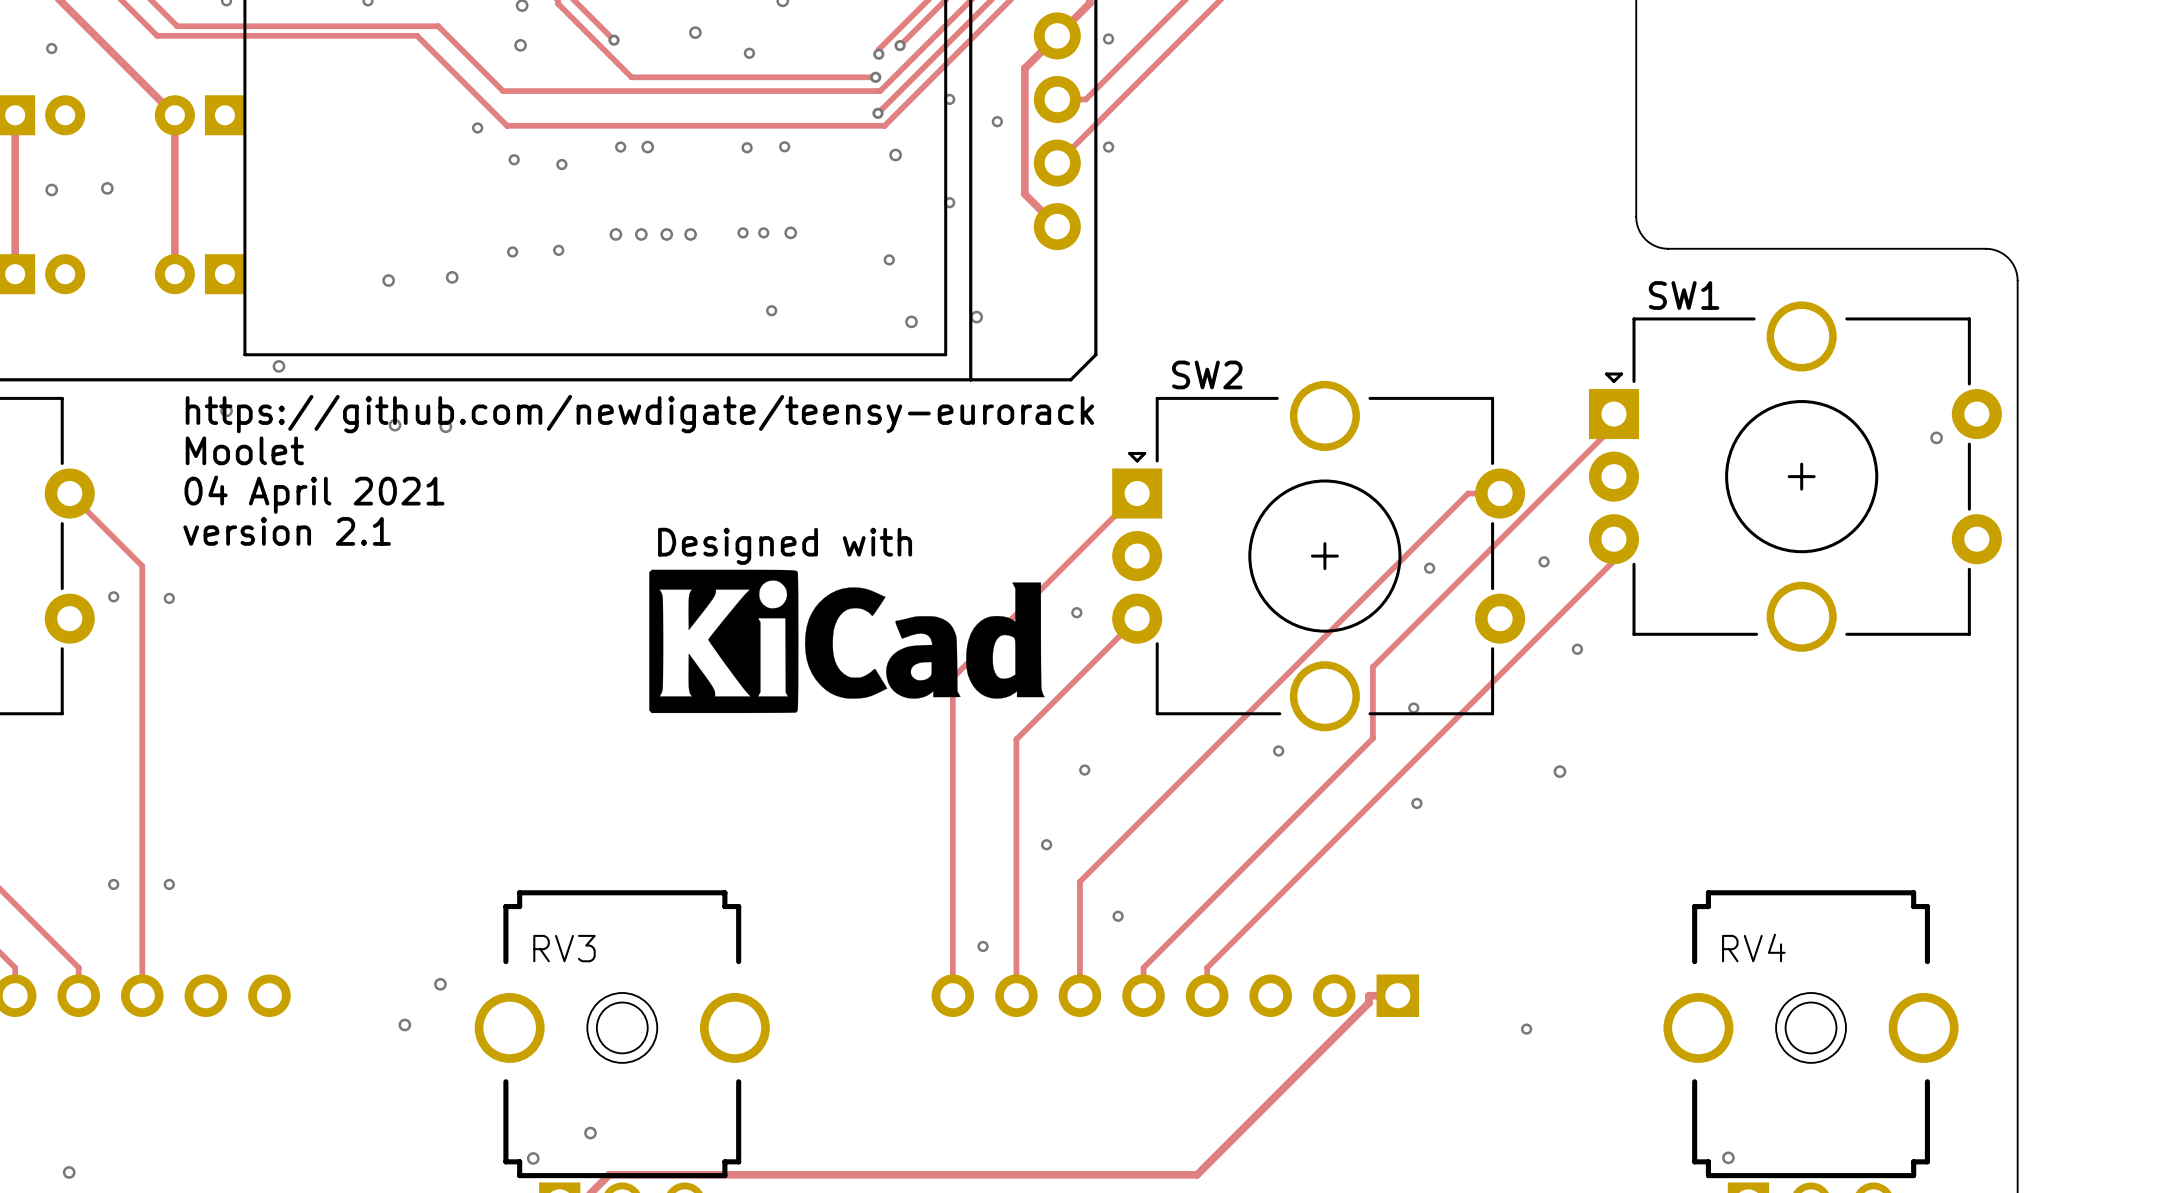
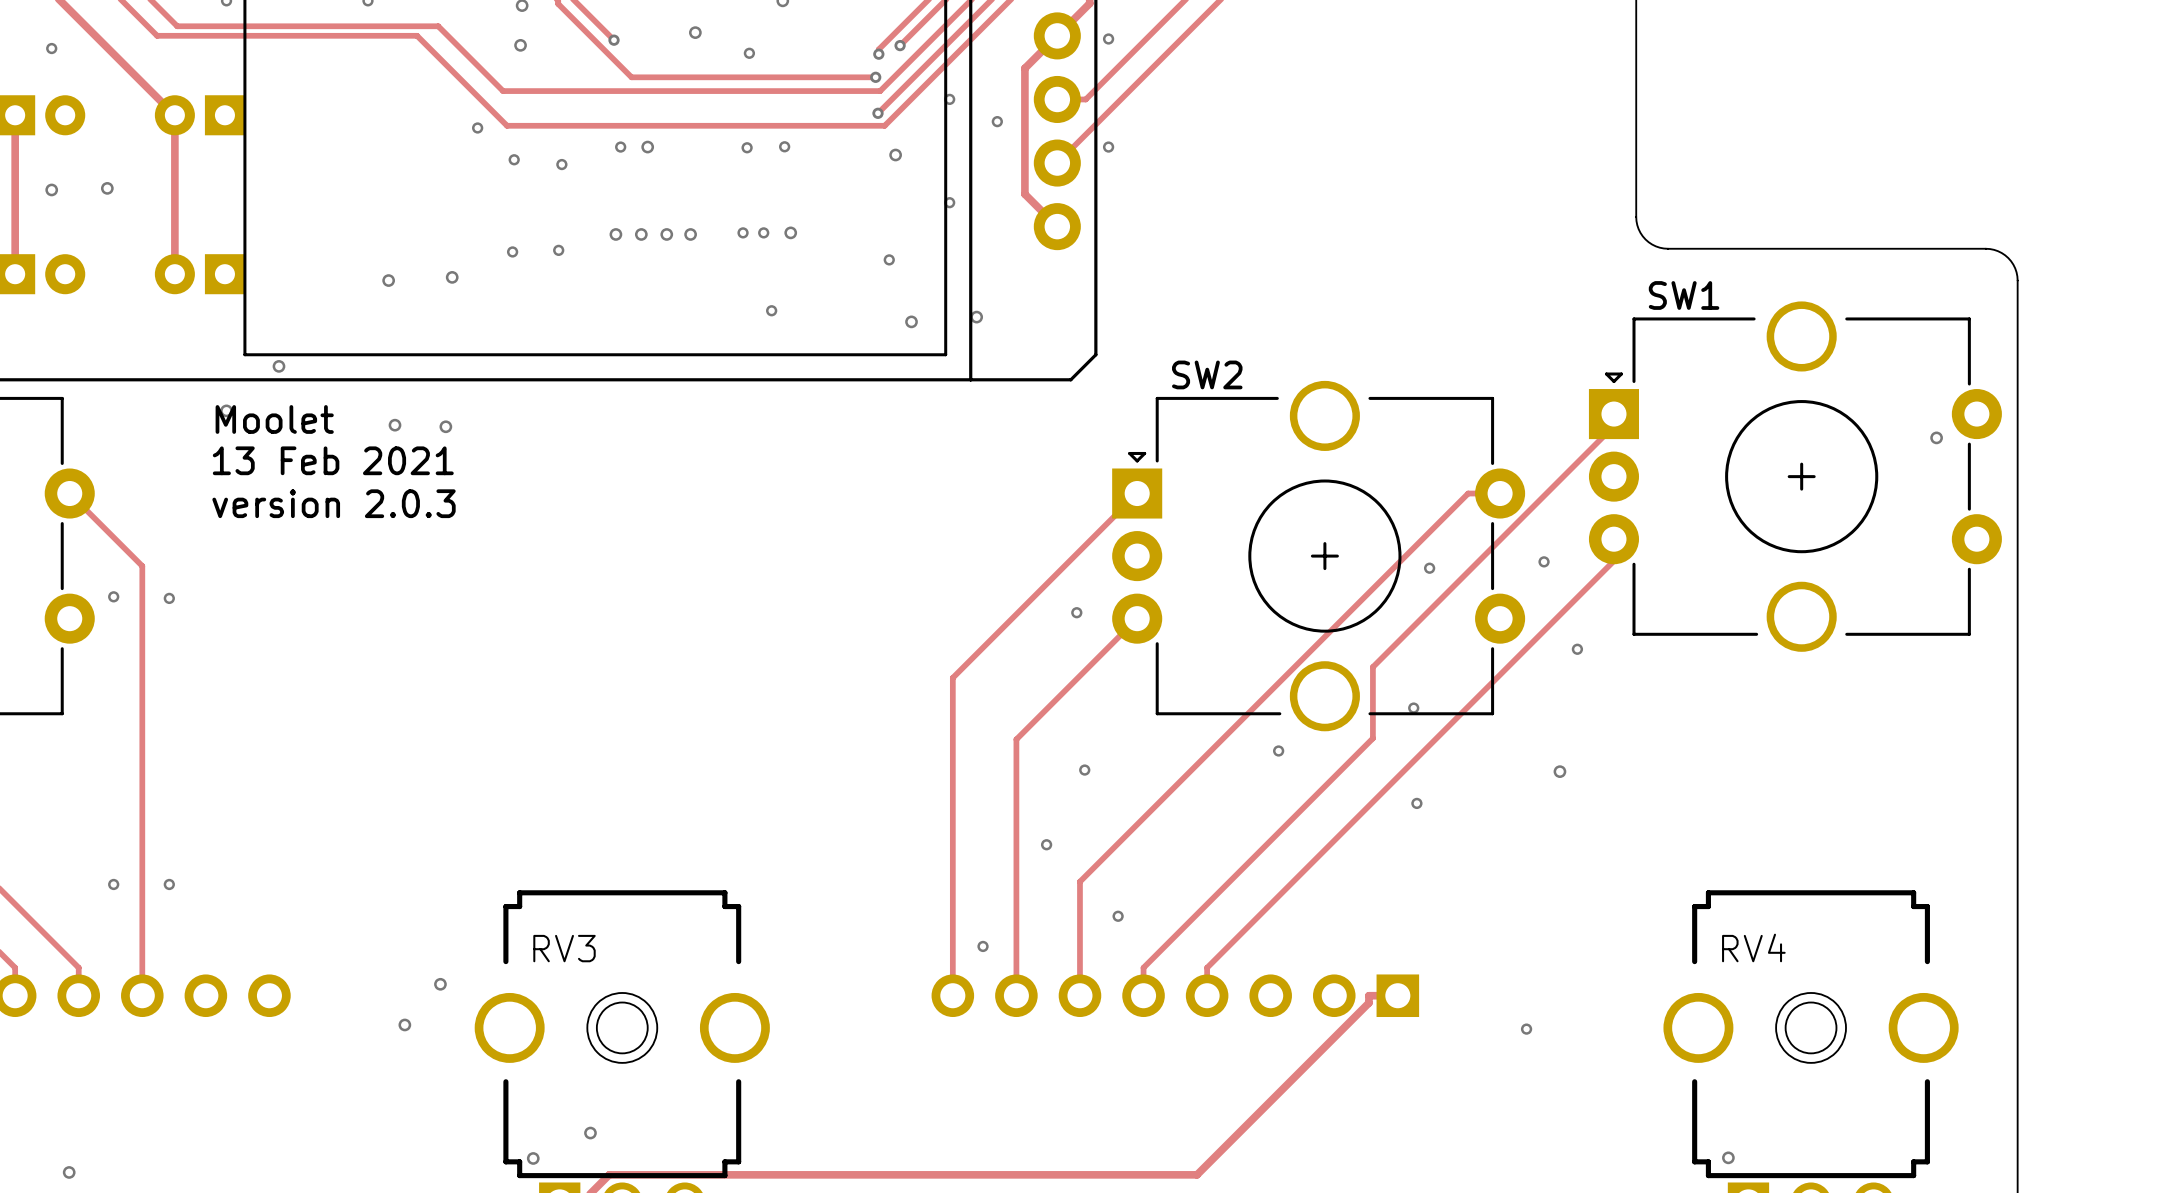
text: https://github.com/newdigate/teensy-eurorack (639, 414) -> none
text position: Moolet (244, 450) -> Moolet (274, 419)
text: none -> 13 Feb 2021 (333, 460)
text: 04 April 2021 (314, 494) -> none
text: version 2.1 (287, 531) -> version 2.0.3 (334, 503)
text: Designed with (785, 546) -> none
drawing: [649, 569, 1045, 714] -> none

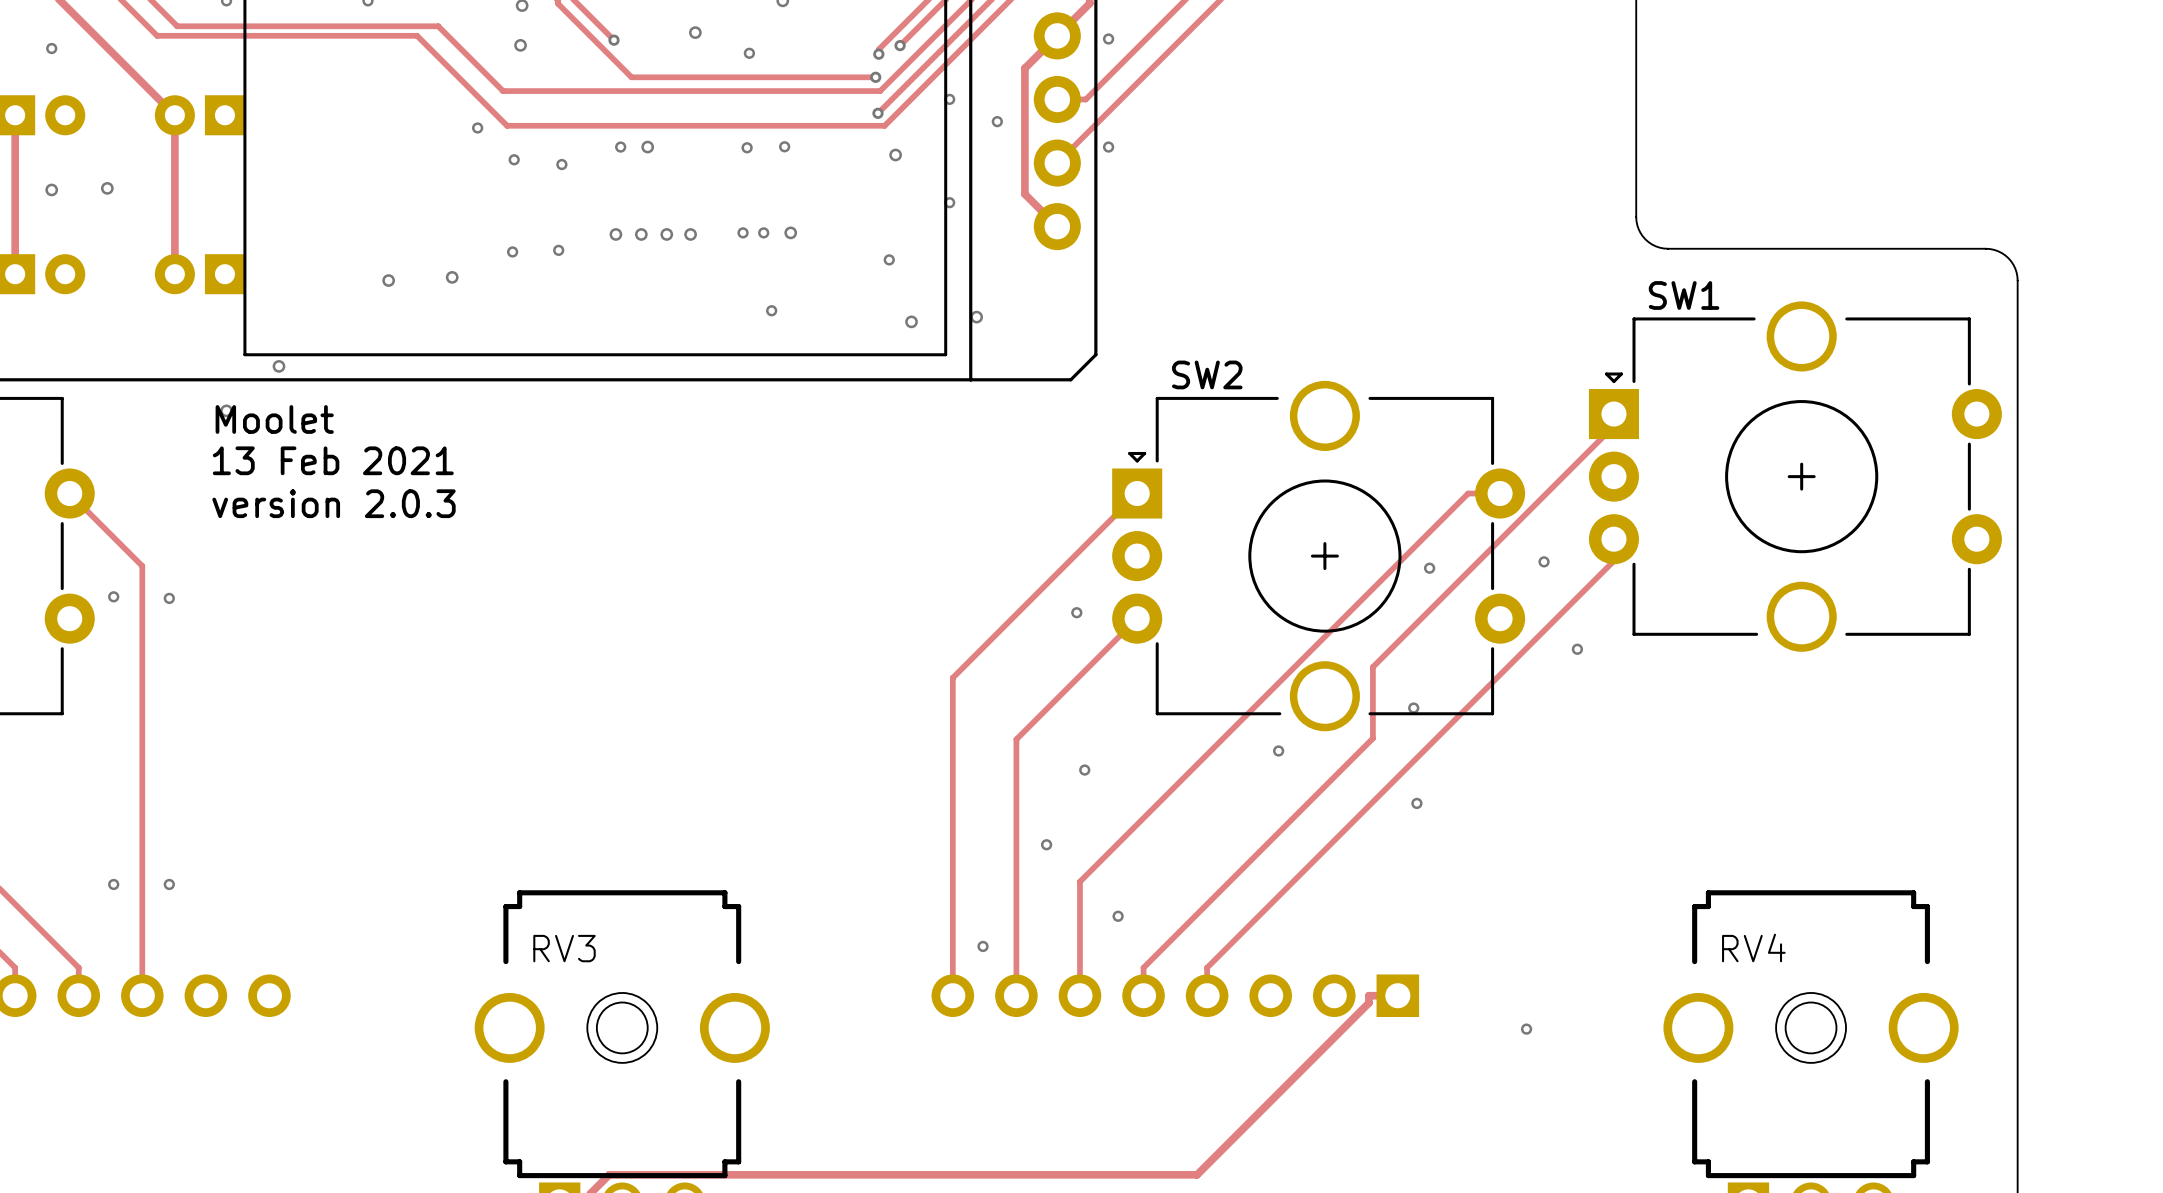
via: (395, 425) -> none
via: (445, 426) -> none
via: (1936, 437) -> none
via: (1559, 771) -> none
via: (440, 984) -> none
via: (404, 1024) -> none
via: (590, 1133) -> none
via: (1728, 1157) -> none
via: (533, 1158) -> none
via: (69, 1172) -> none

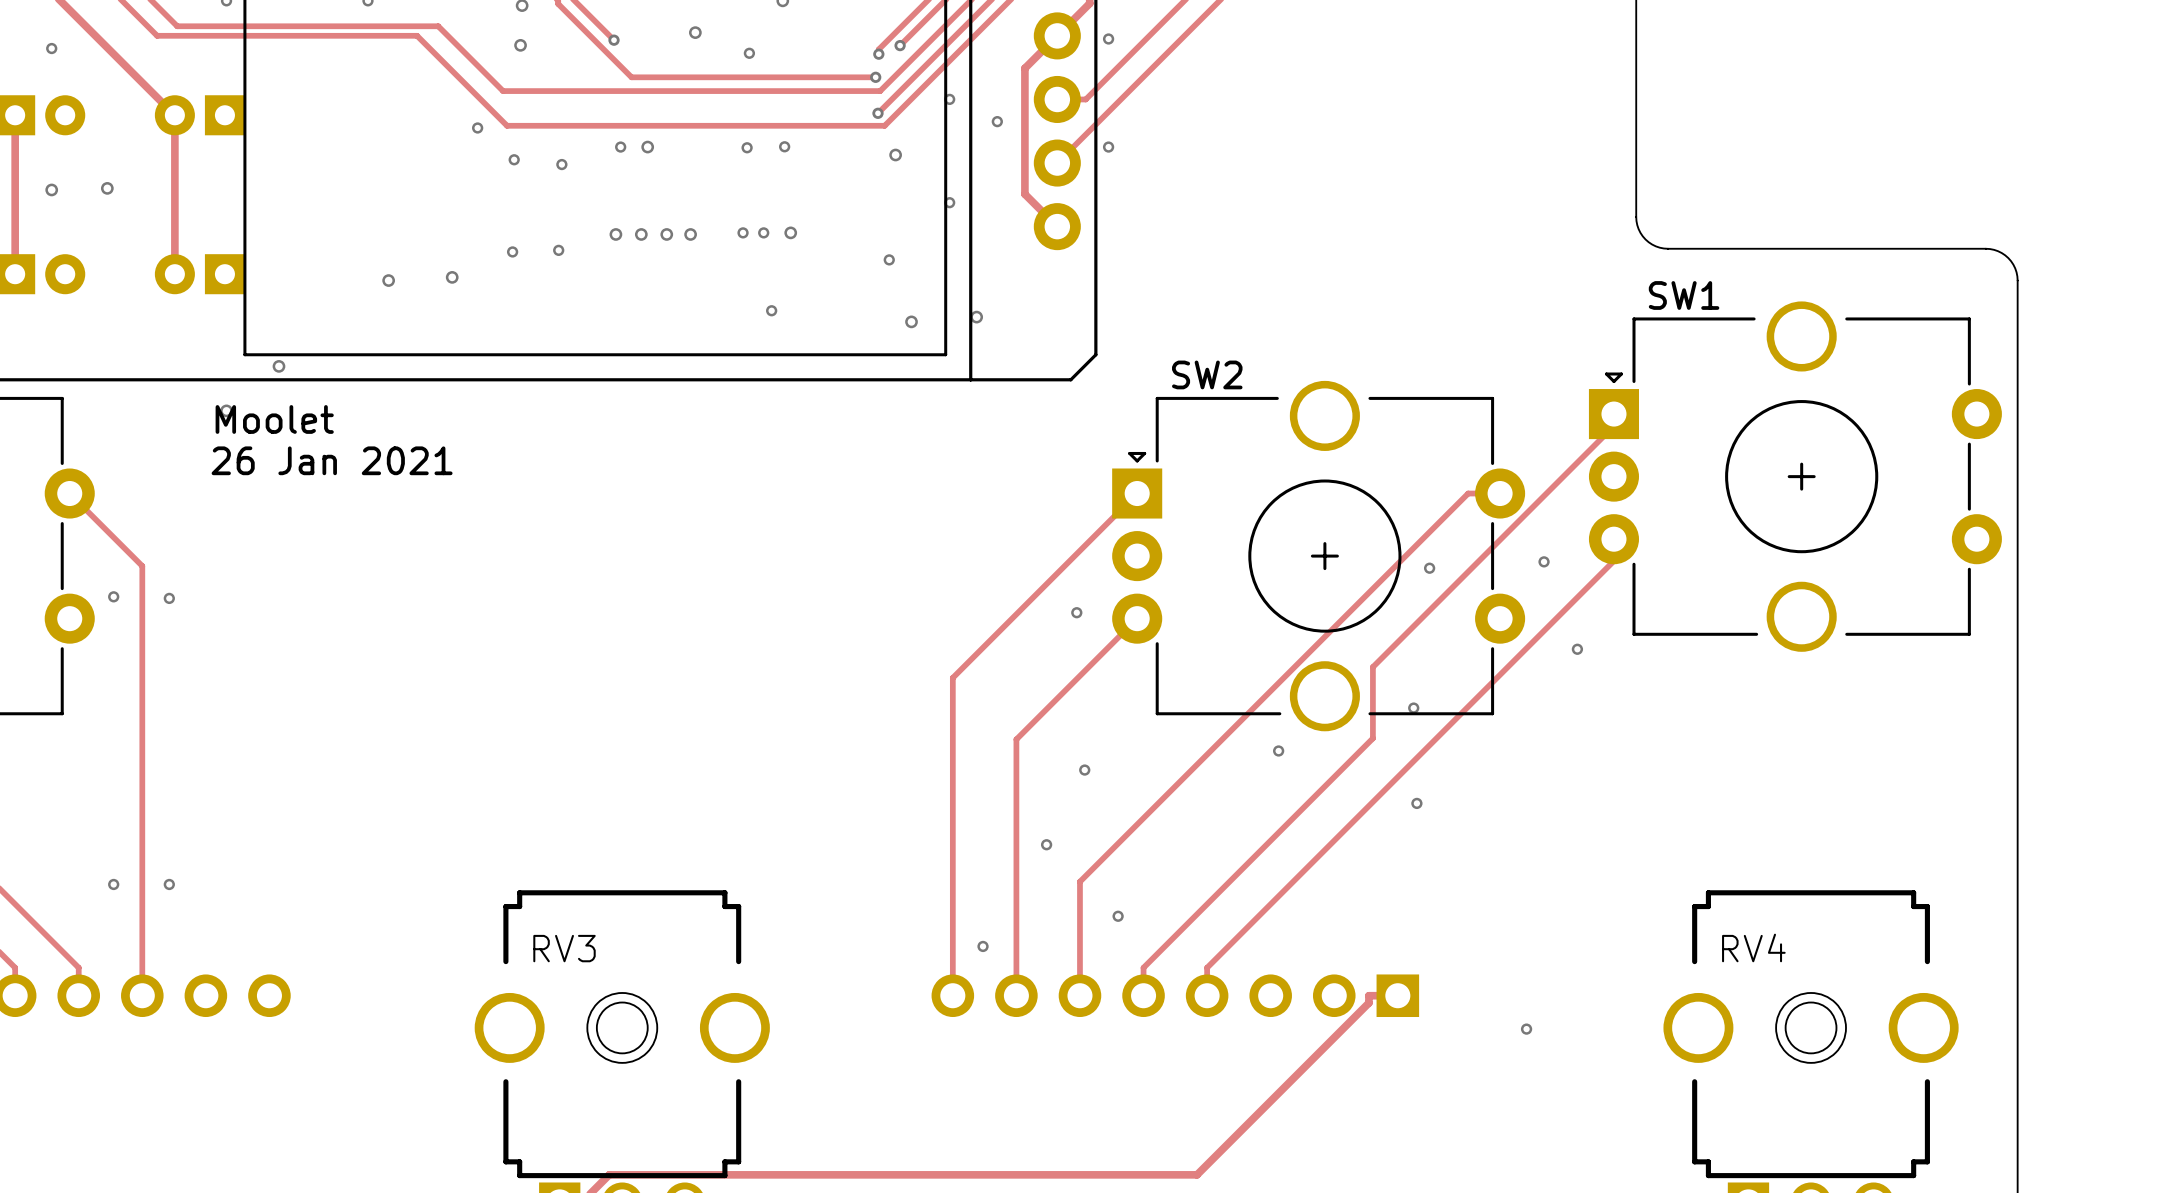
text: 13 Feb 2021 (333, 460) -> 26 Jan 2021 (332, 460)
text: version 2.0.3 (334, 503) -> none

